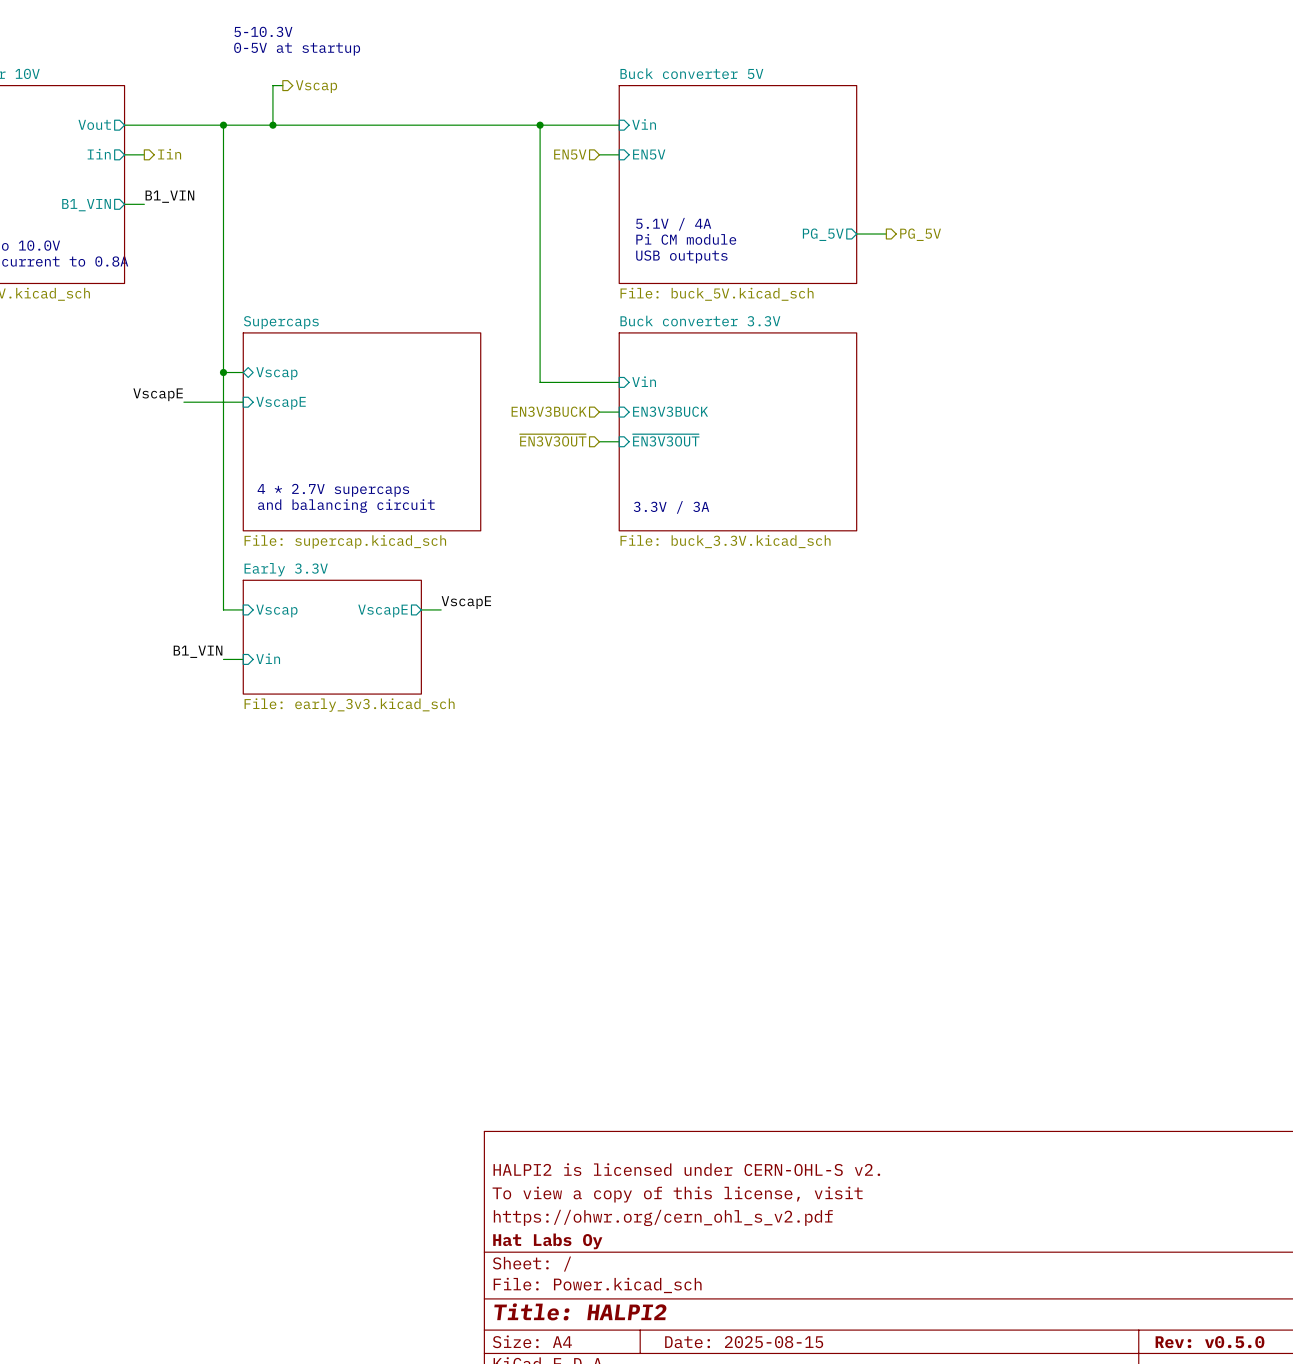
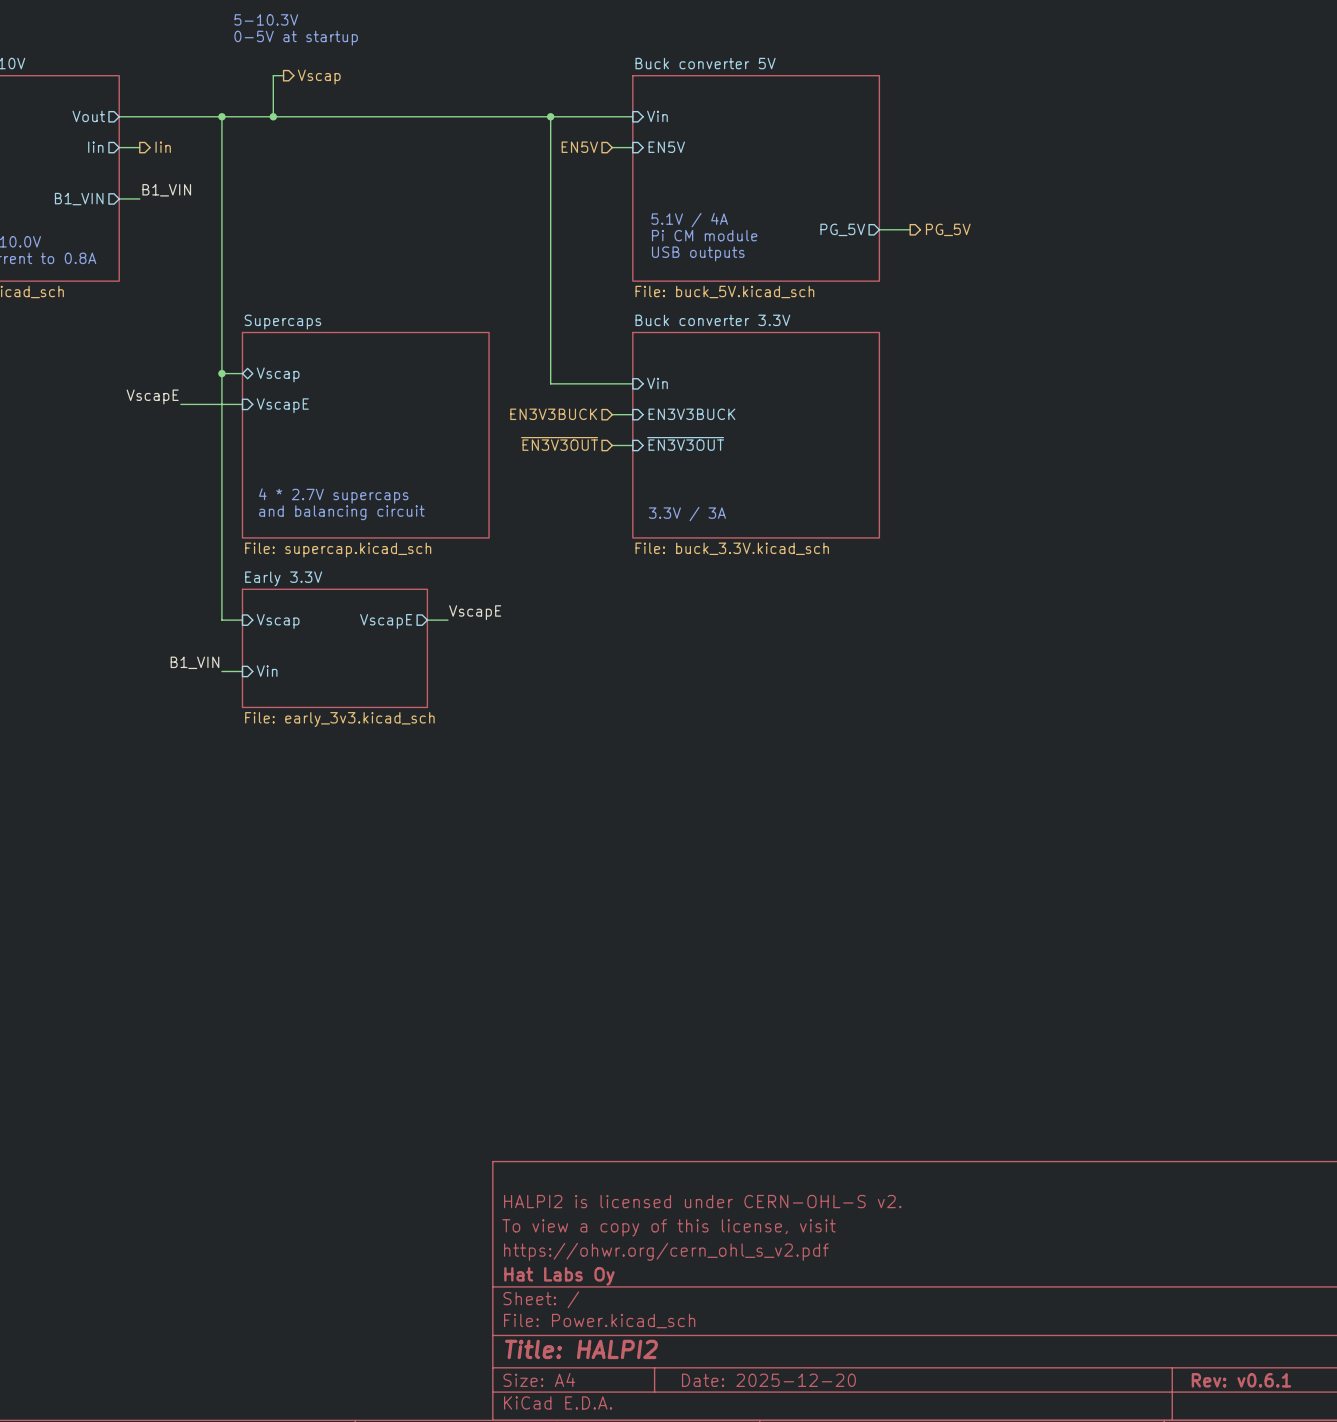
title block: Date: 2025-08-15 (744, 1342) -> Date: 2025-12-20 (768, 1380)
title block: Rev: v0.5.0 (1210, 1342) -> Rev: v0.6.1 (1241, 1380)

